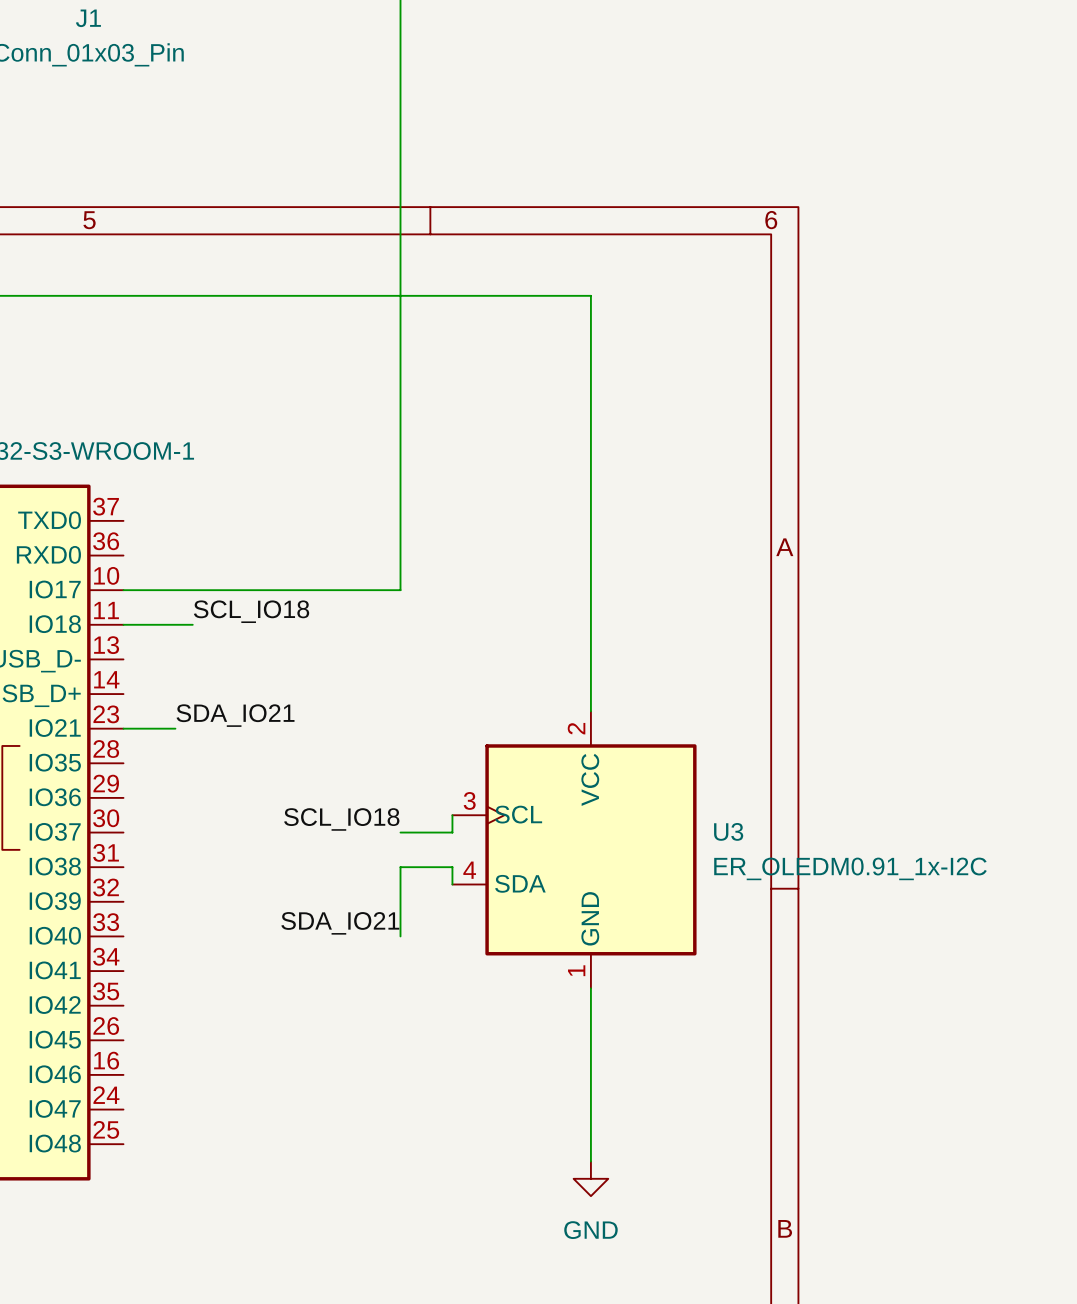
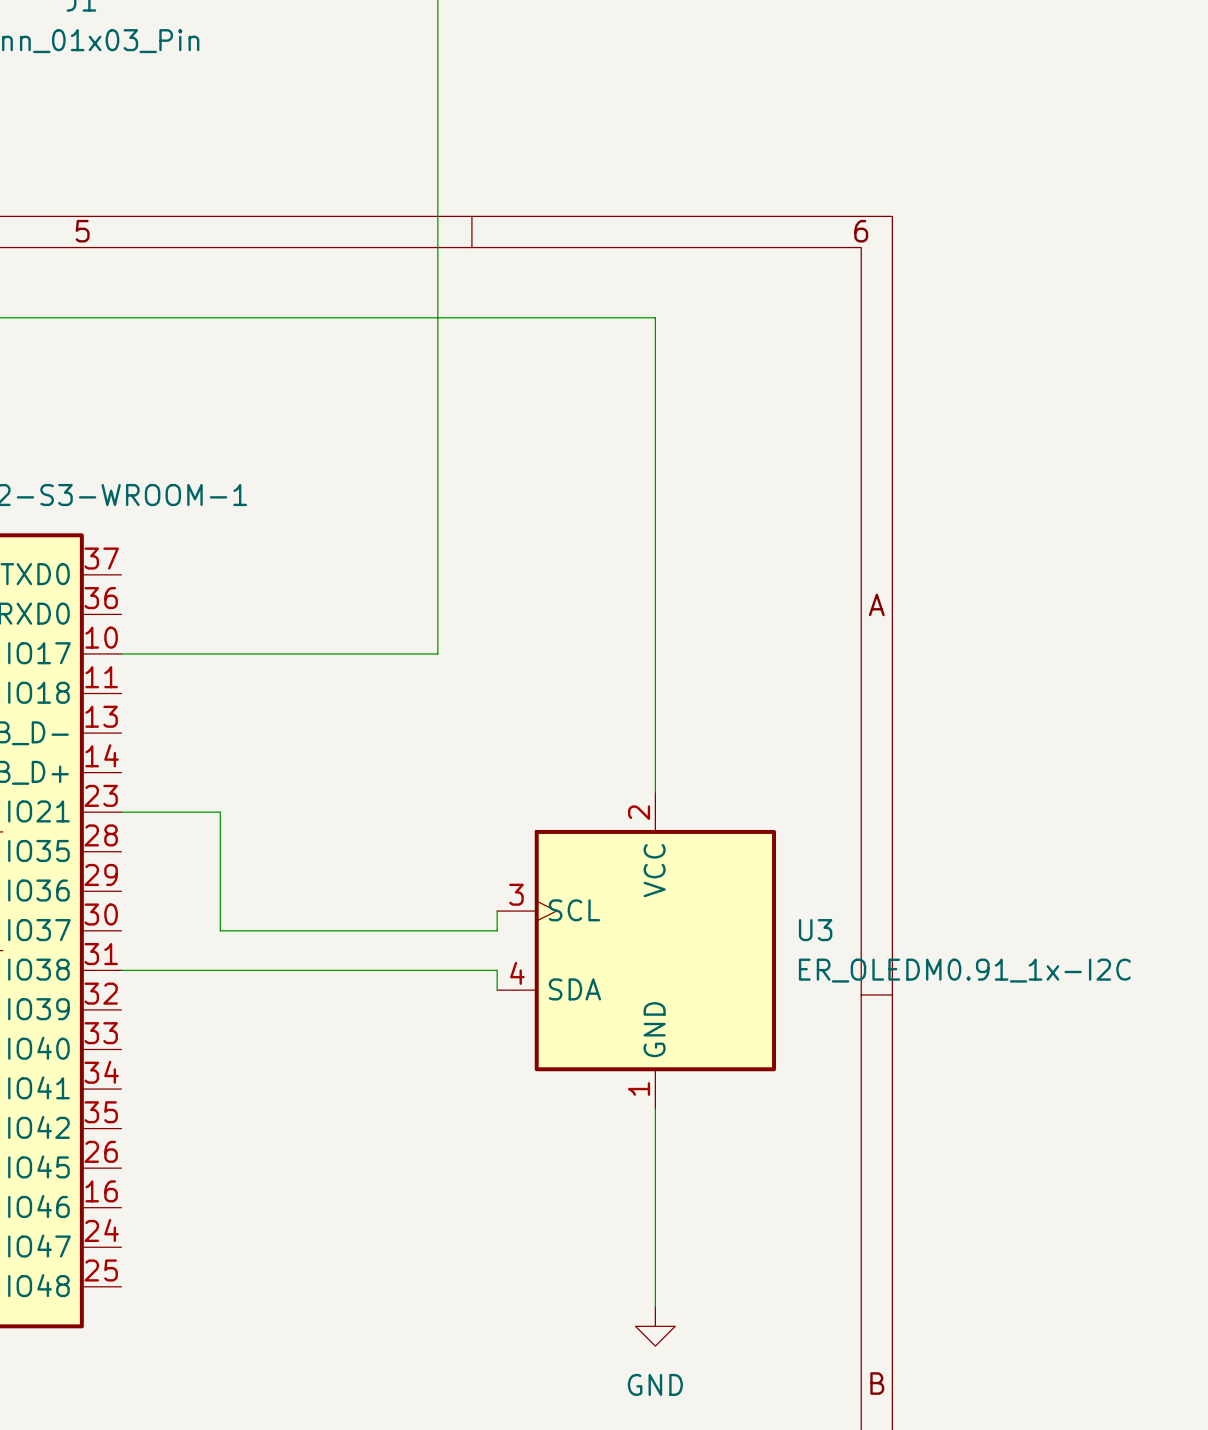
label: SCL_IO18 (251, 611) -> none
wire: (123, 624) (192, 624) -> none
label: SDA_IO21 (235, 715) -> none
wire: none -> (180, 812) (220, 812) (220, 930) (437, 930)
label: SCL_IO18 (341, 819) -> none
wire: (400, 867) (400, 936) -> (437, 970) (121, 970)
label: SDA_IO21 (340, 923) -> none

